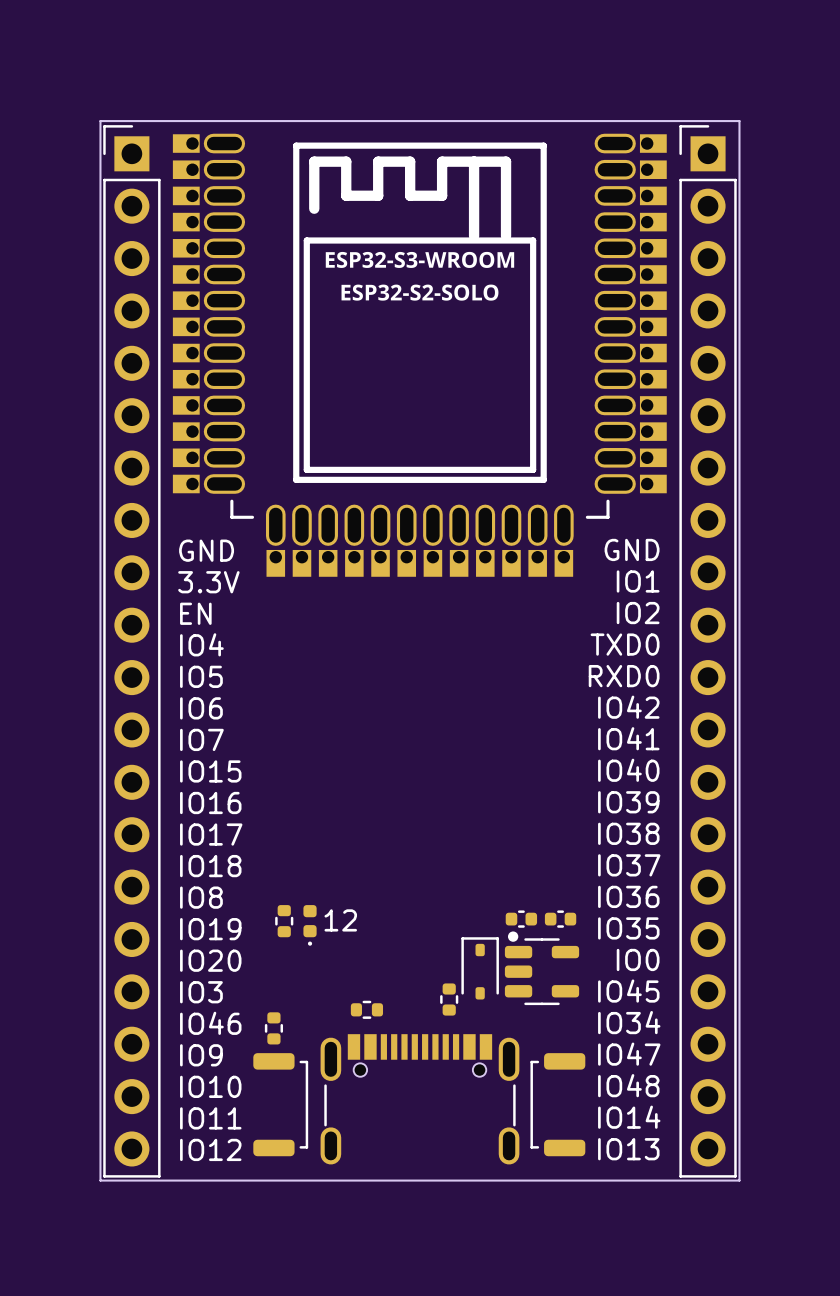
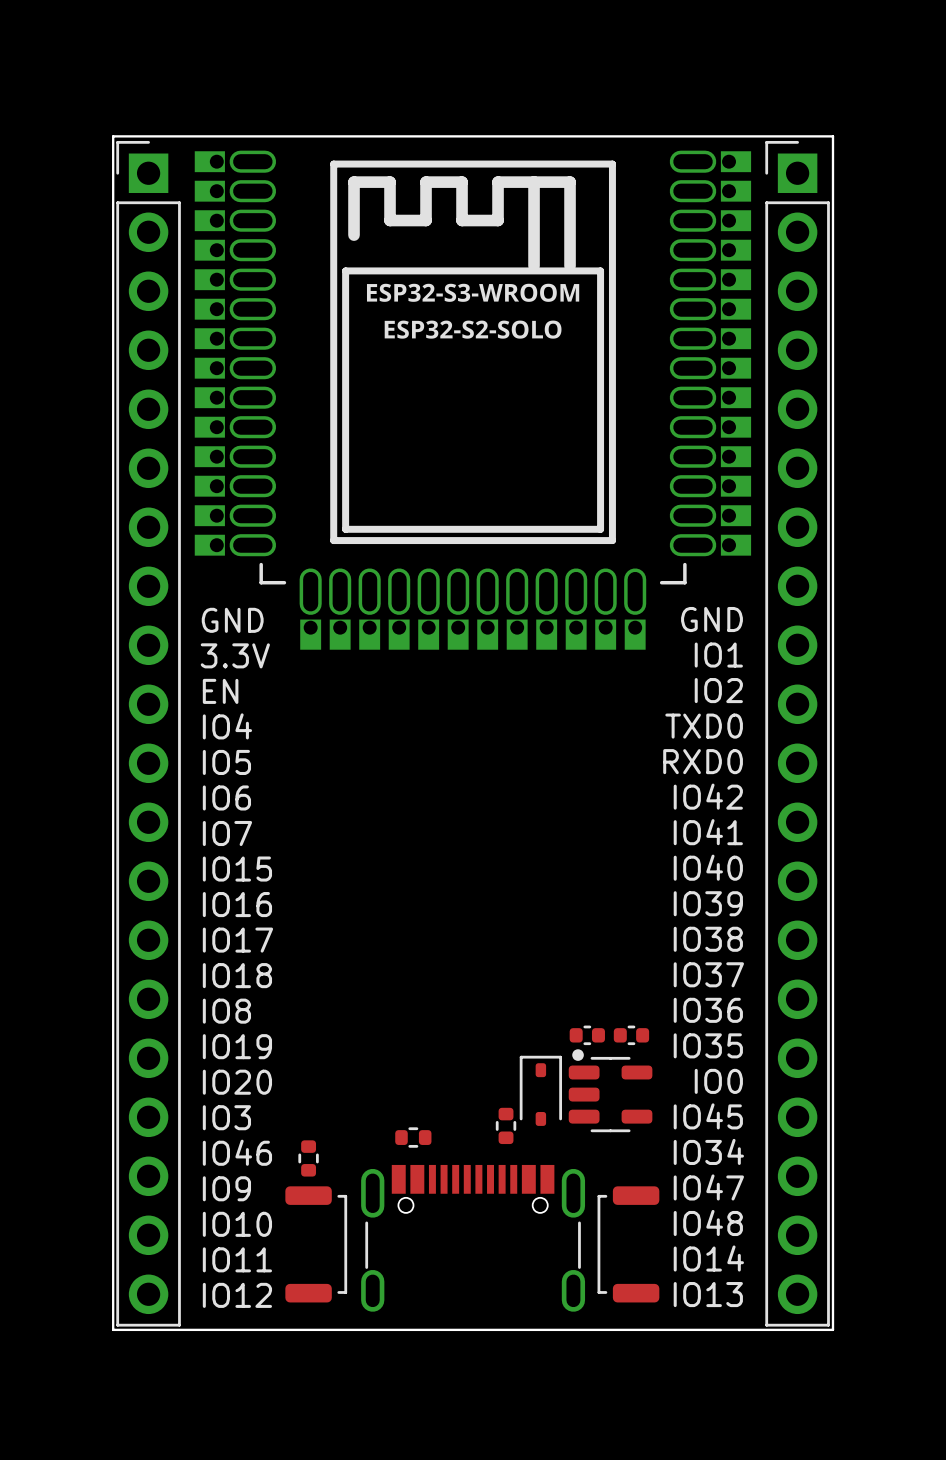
text: 12 (340, 920) -> none
part: (284, 921) -> none
part: (310, 925) -> none

